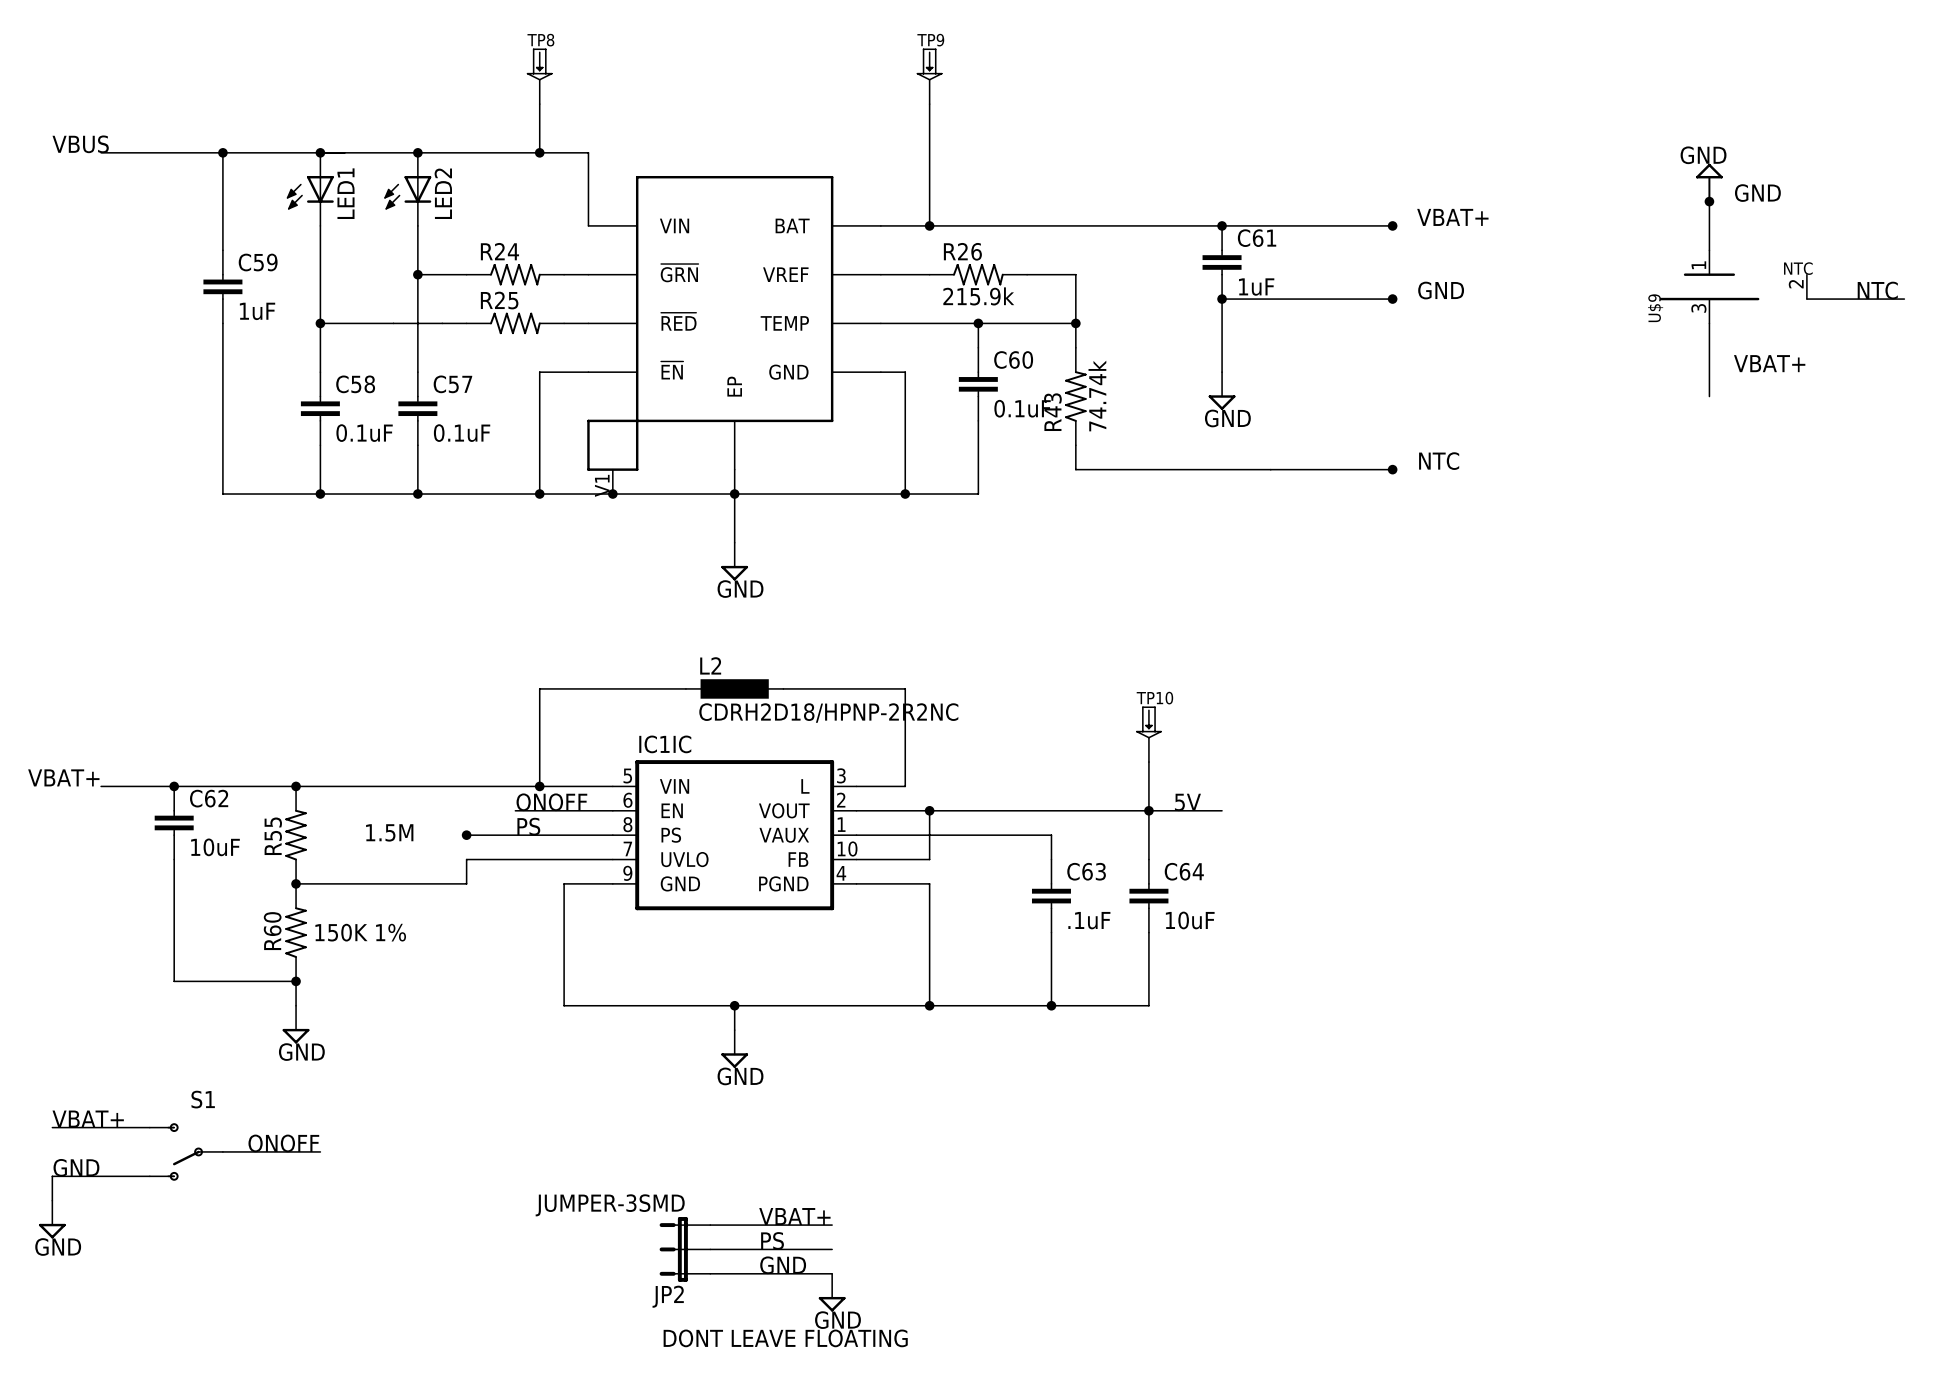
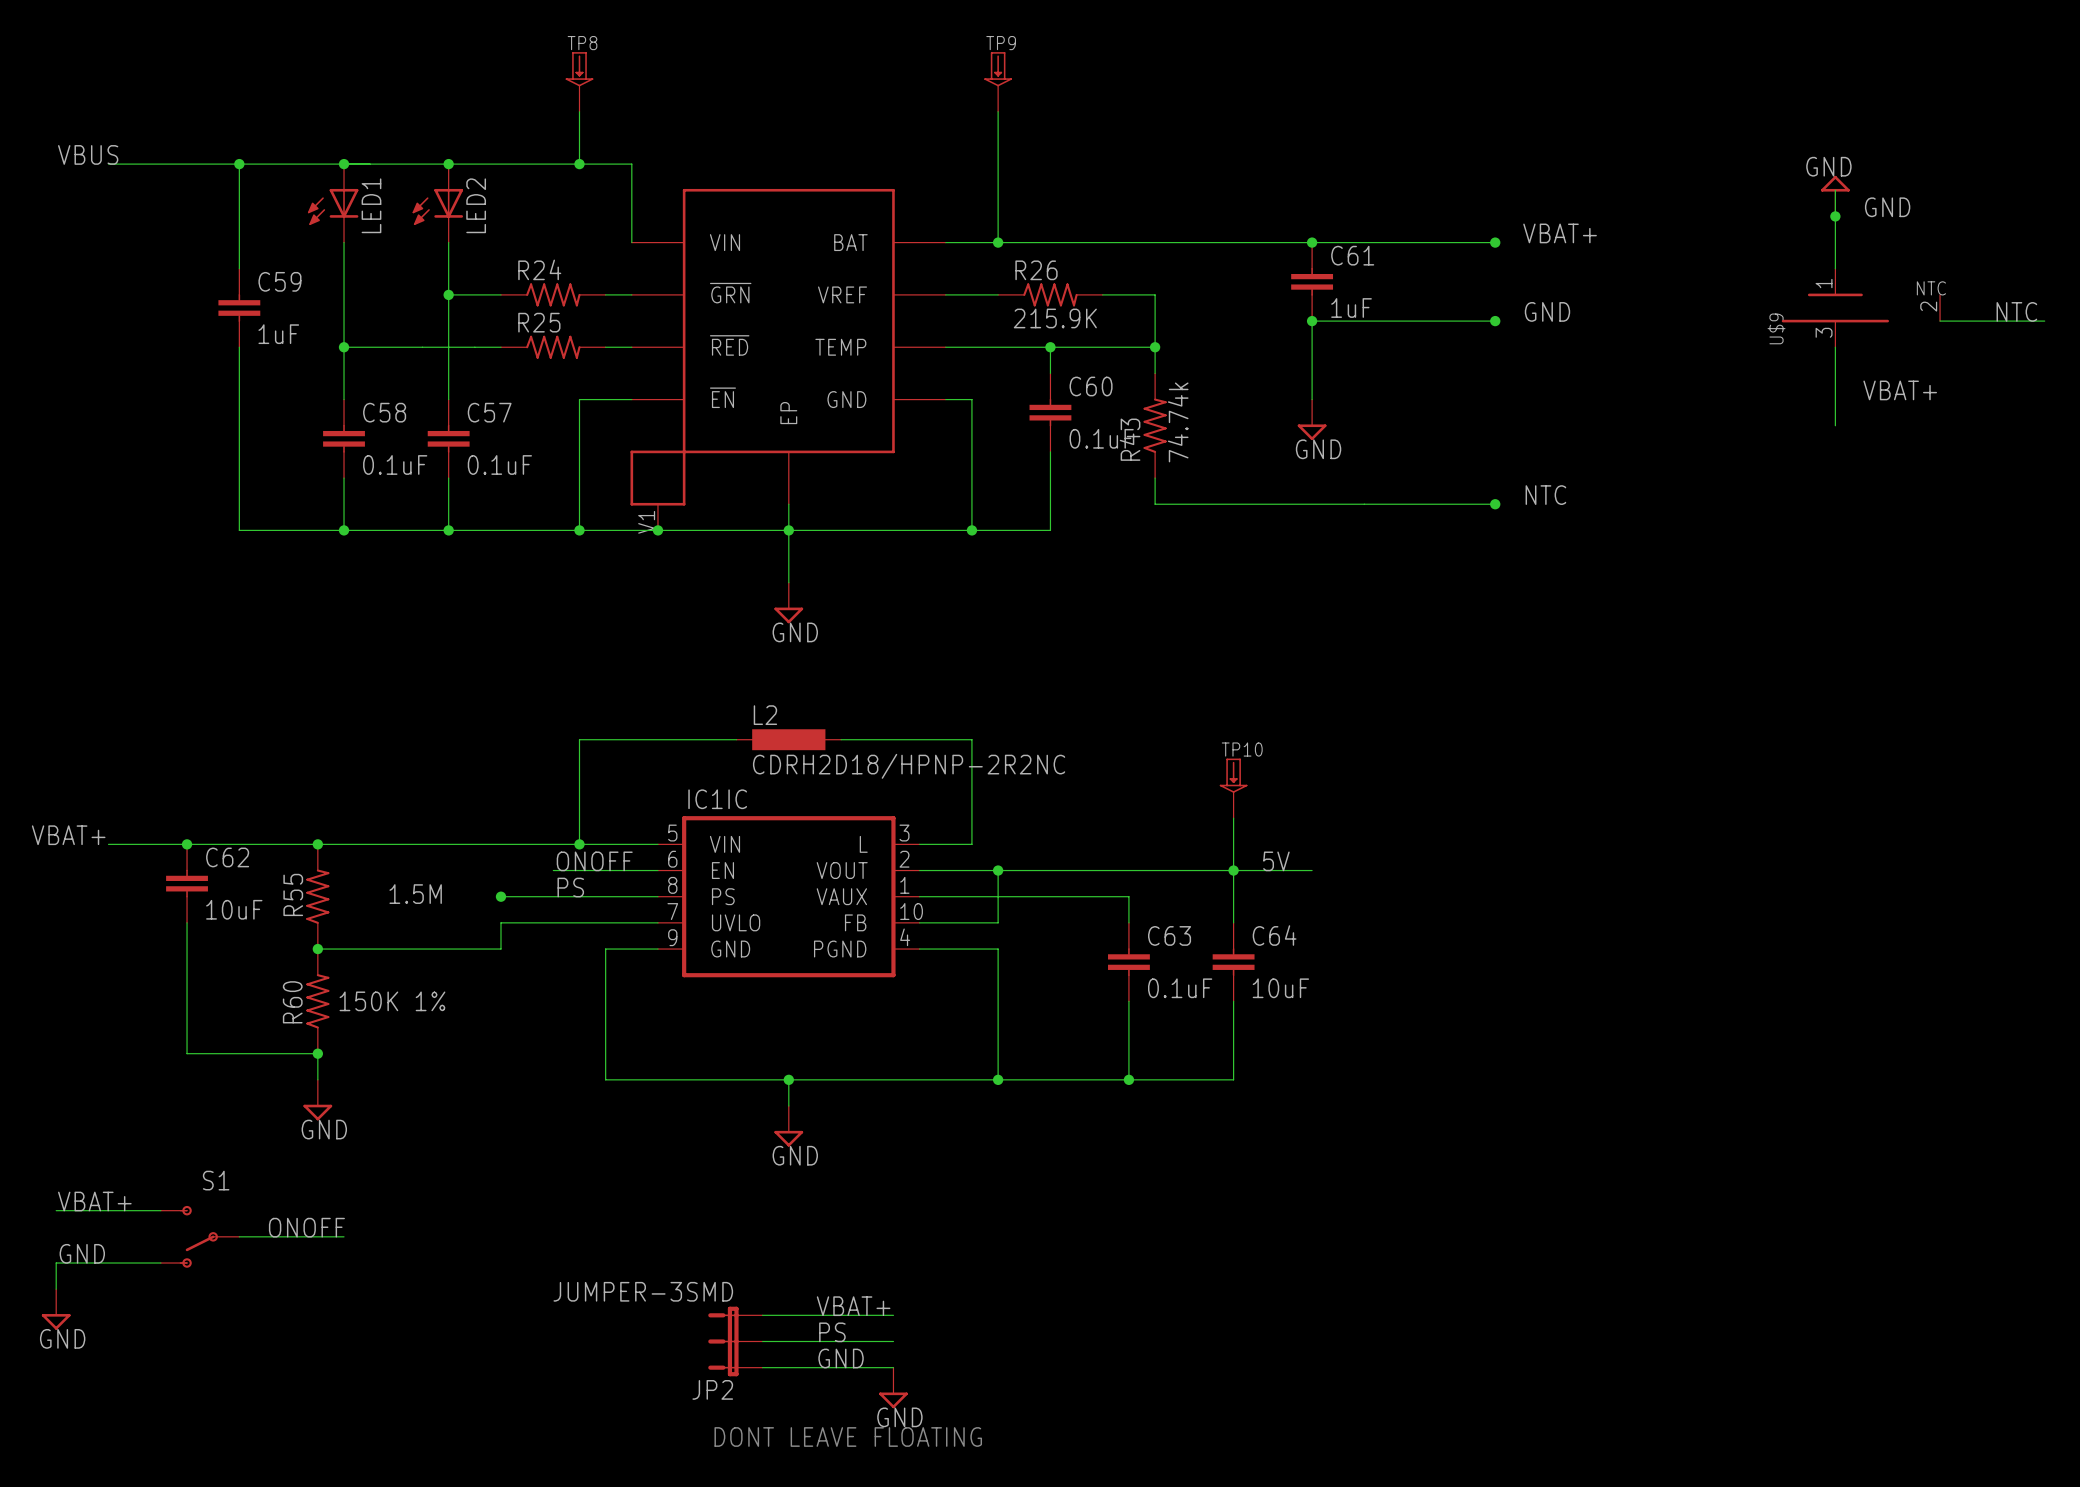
R26 value: 215.9k (978, 296) -> 215.9K (1055, 318)
C63 value: .1uF (1089, 920) -> 0.1uF (1180, 988)

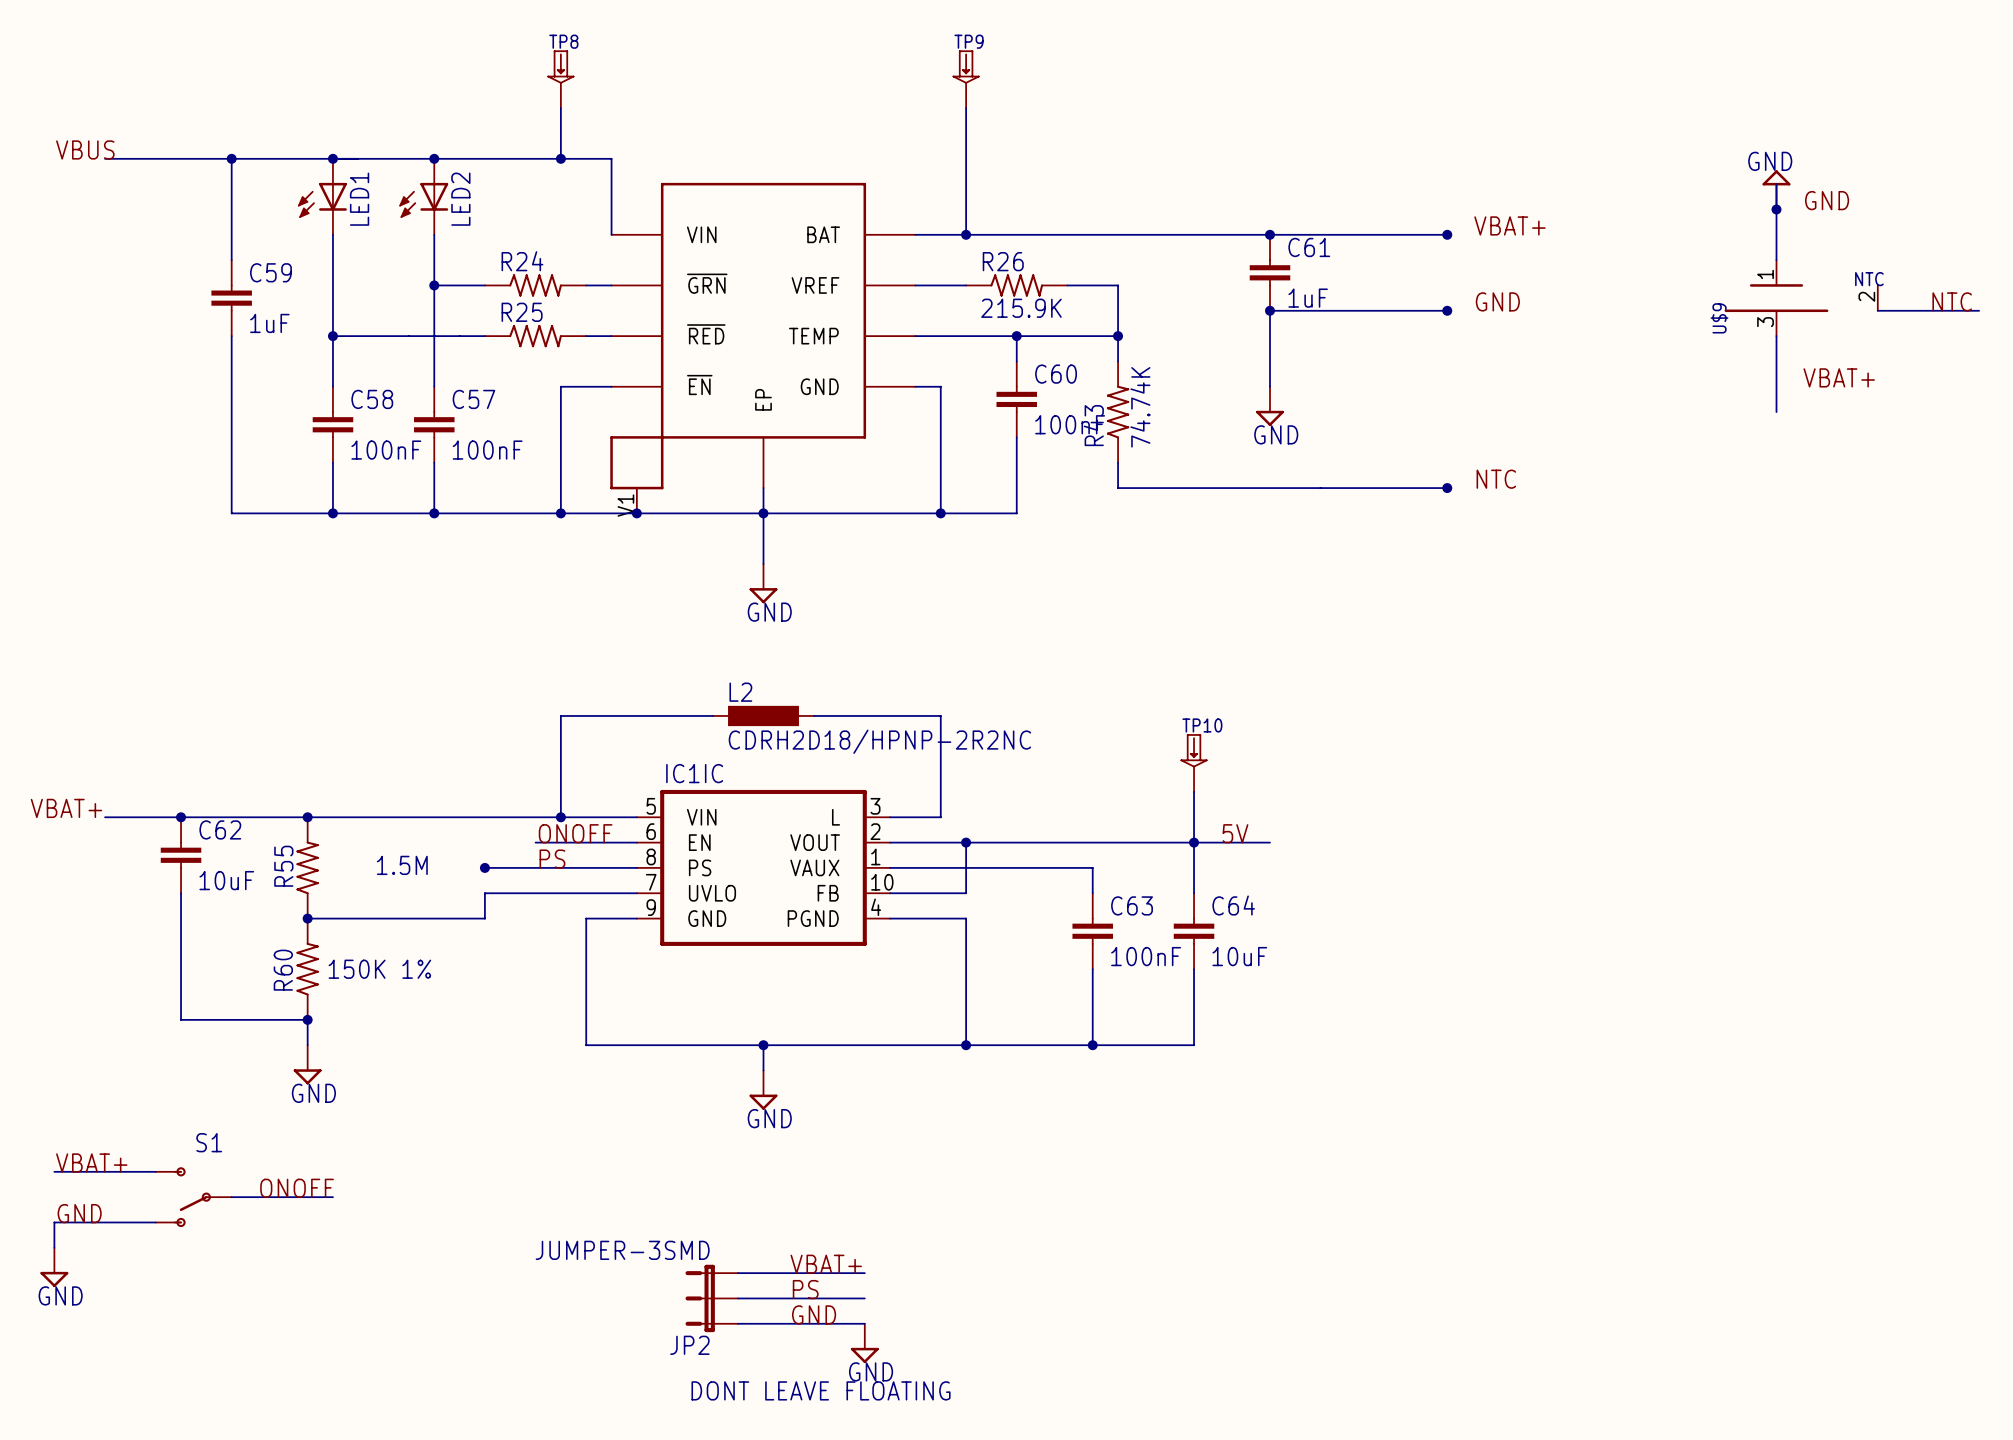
R43 value: 74.74k (1178, 422) -> 74.74K (1140, 407)
C60 value: 0.1uF (1101, 438) -> 100nF (1070, 424)
C58 value: 0.1uF (395, 464) -> 100nF (386, 450)
C57 value: 0.1uF (499, 464) -> 100nF (487, 450)
C63 value: 0.1uF (1180, 988) -> 100nF (1146, 956)

